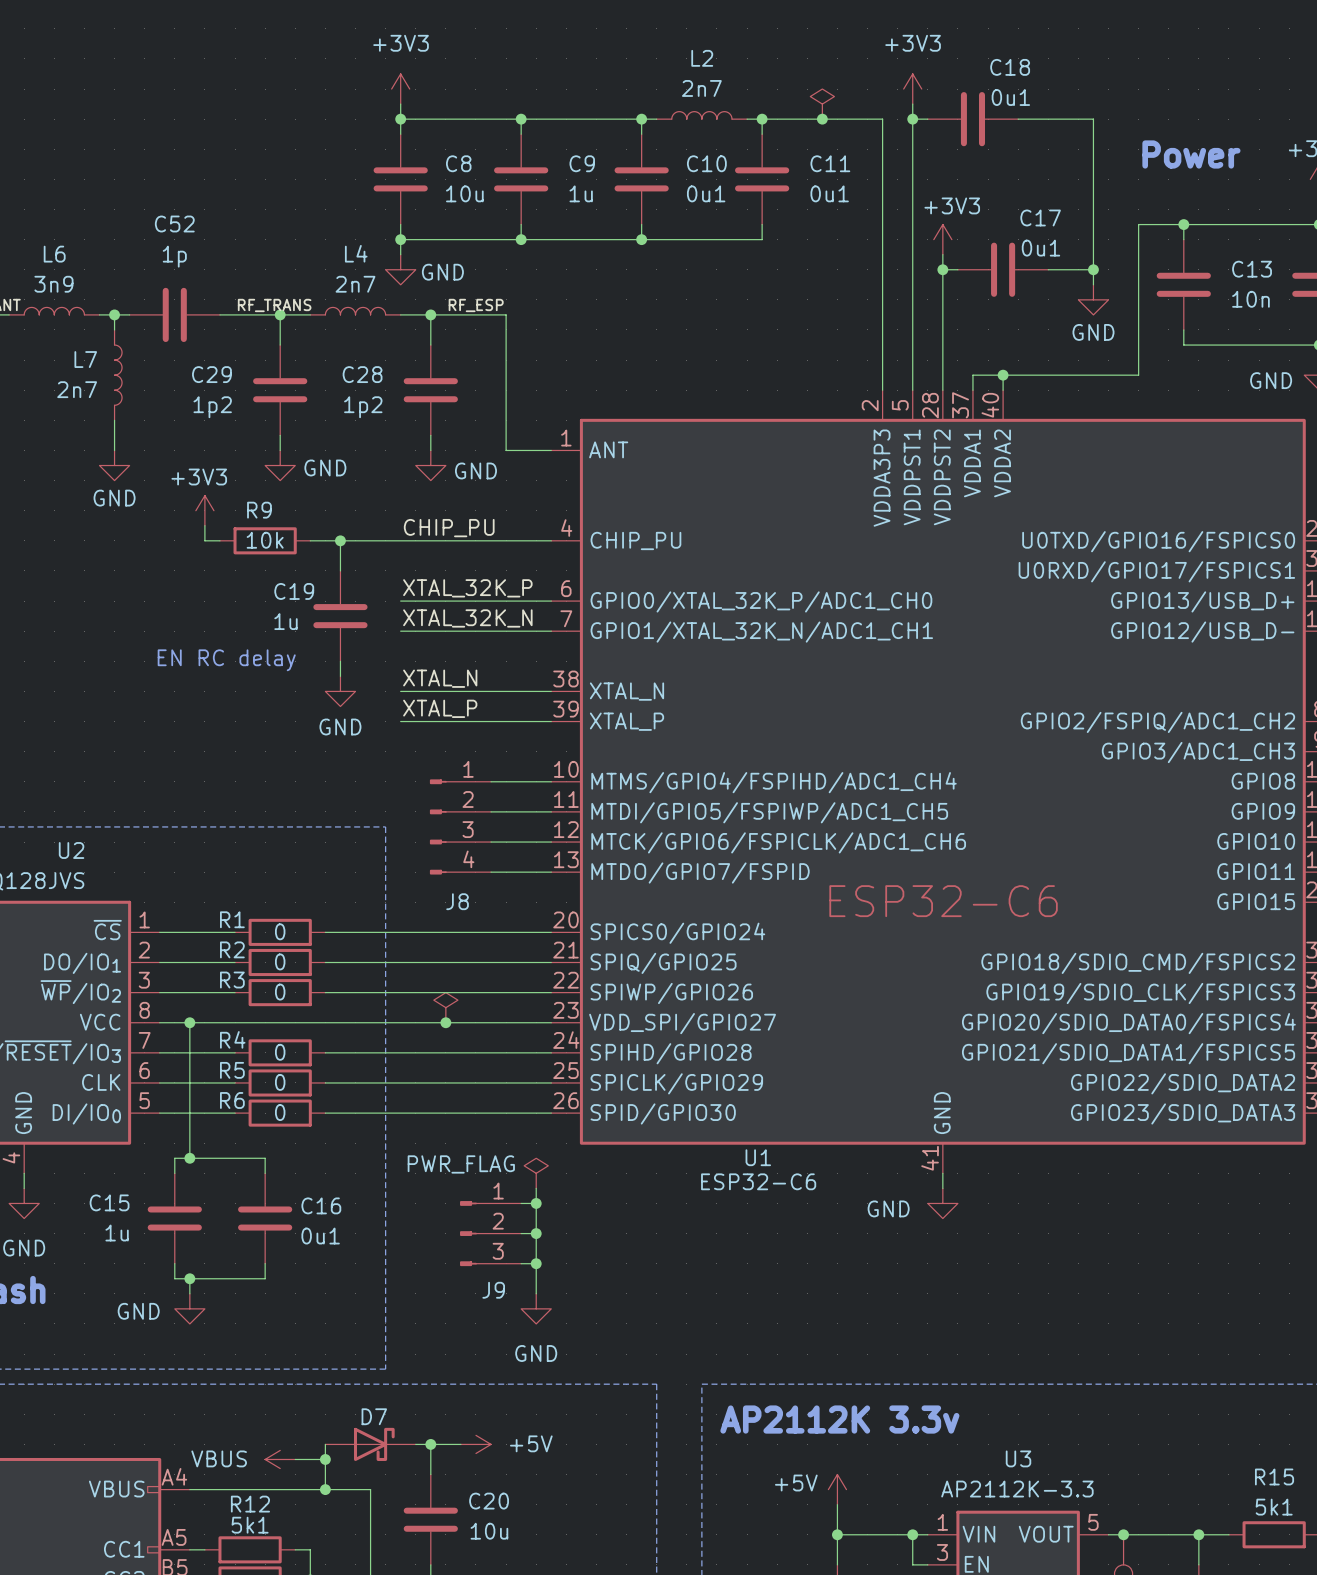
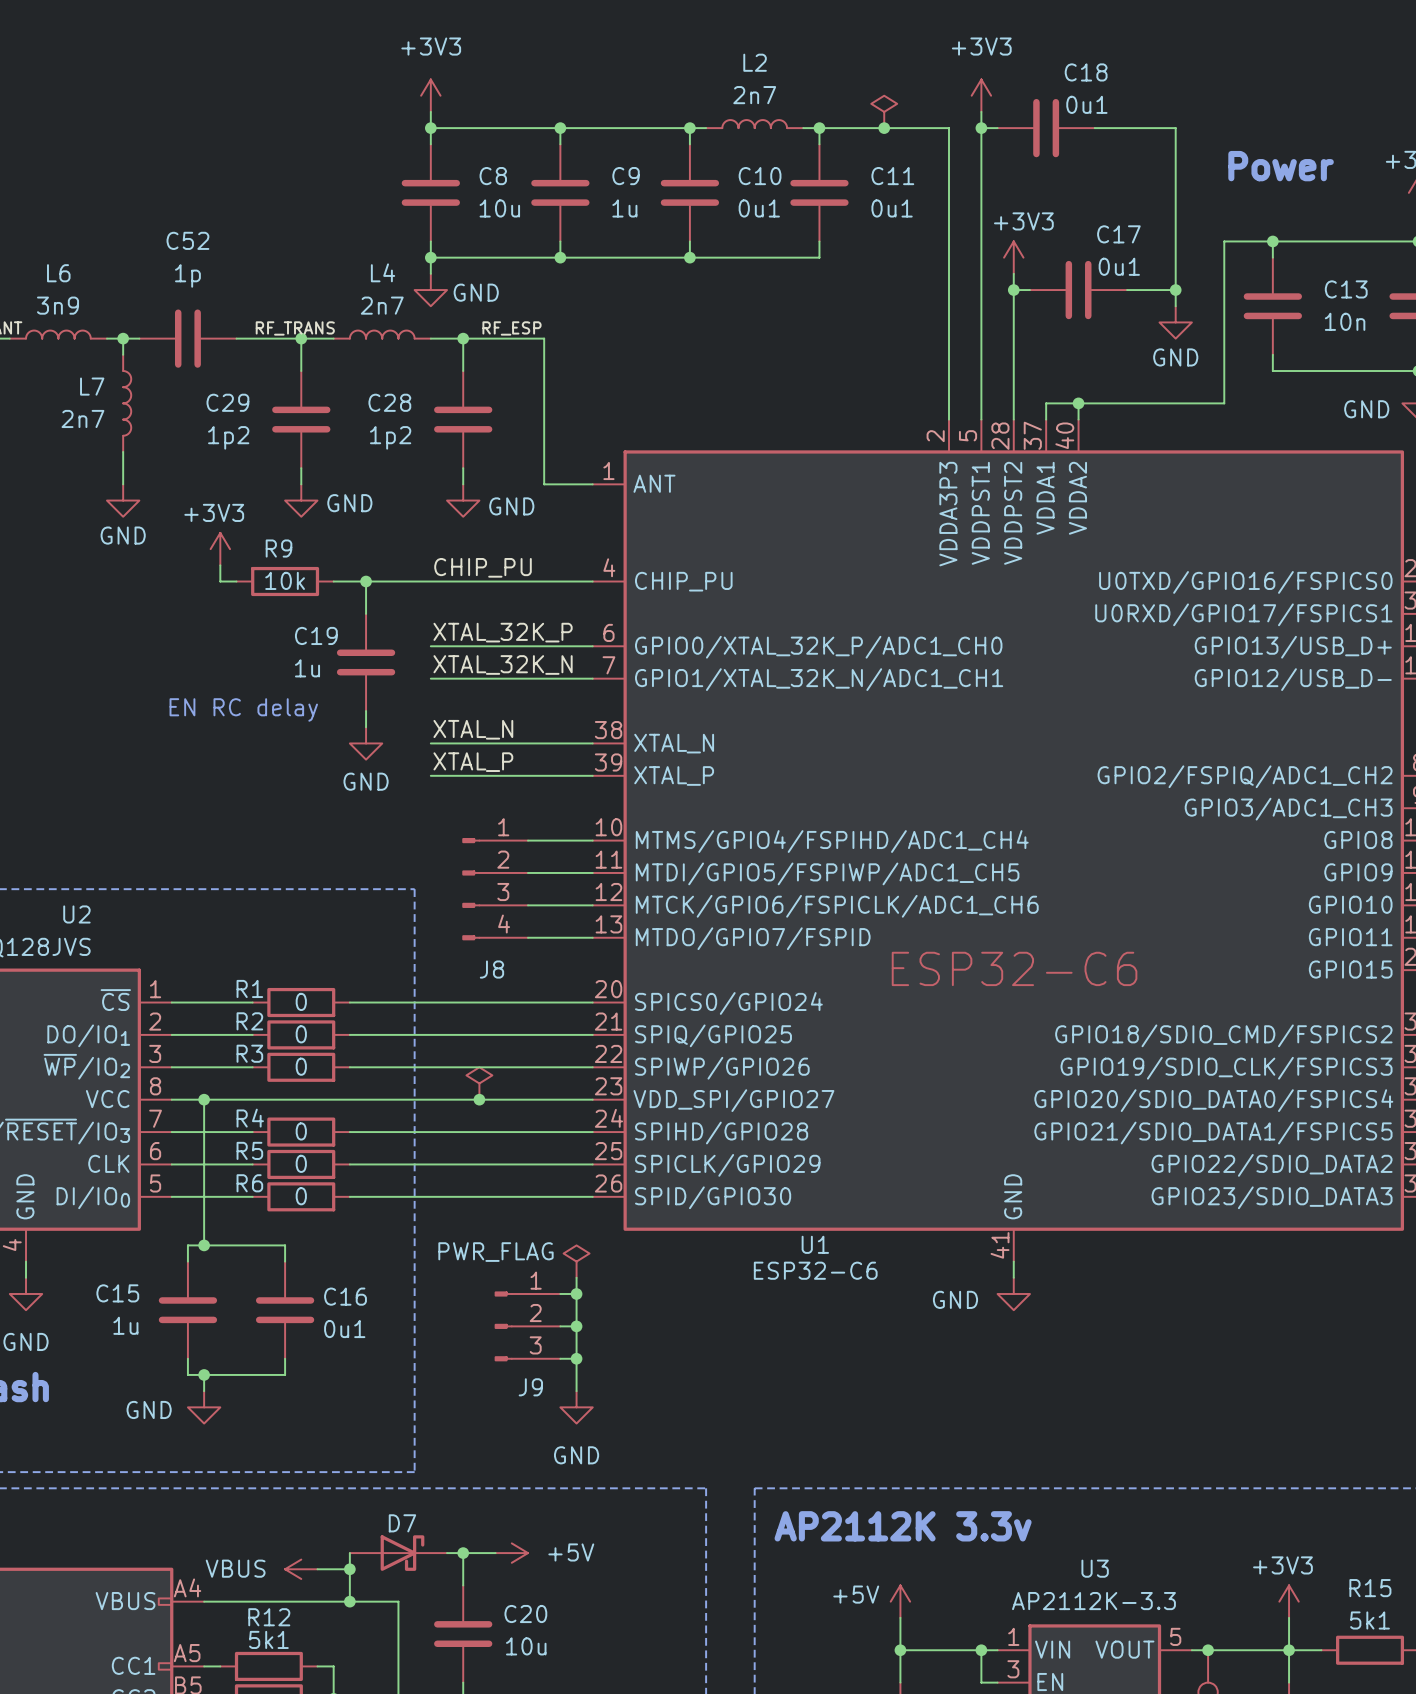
power symbol: none -> +3V3 (1289, 1601)
wire: none -> (1289, 1617) (1289, 1650)

